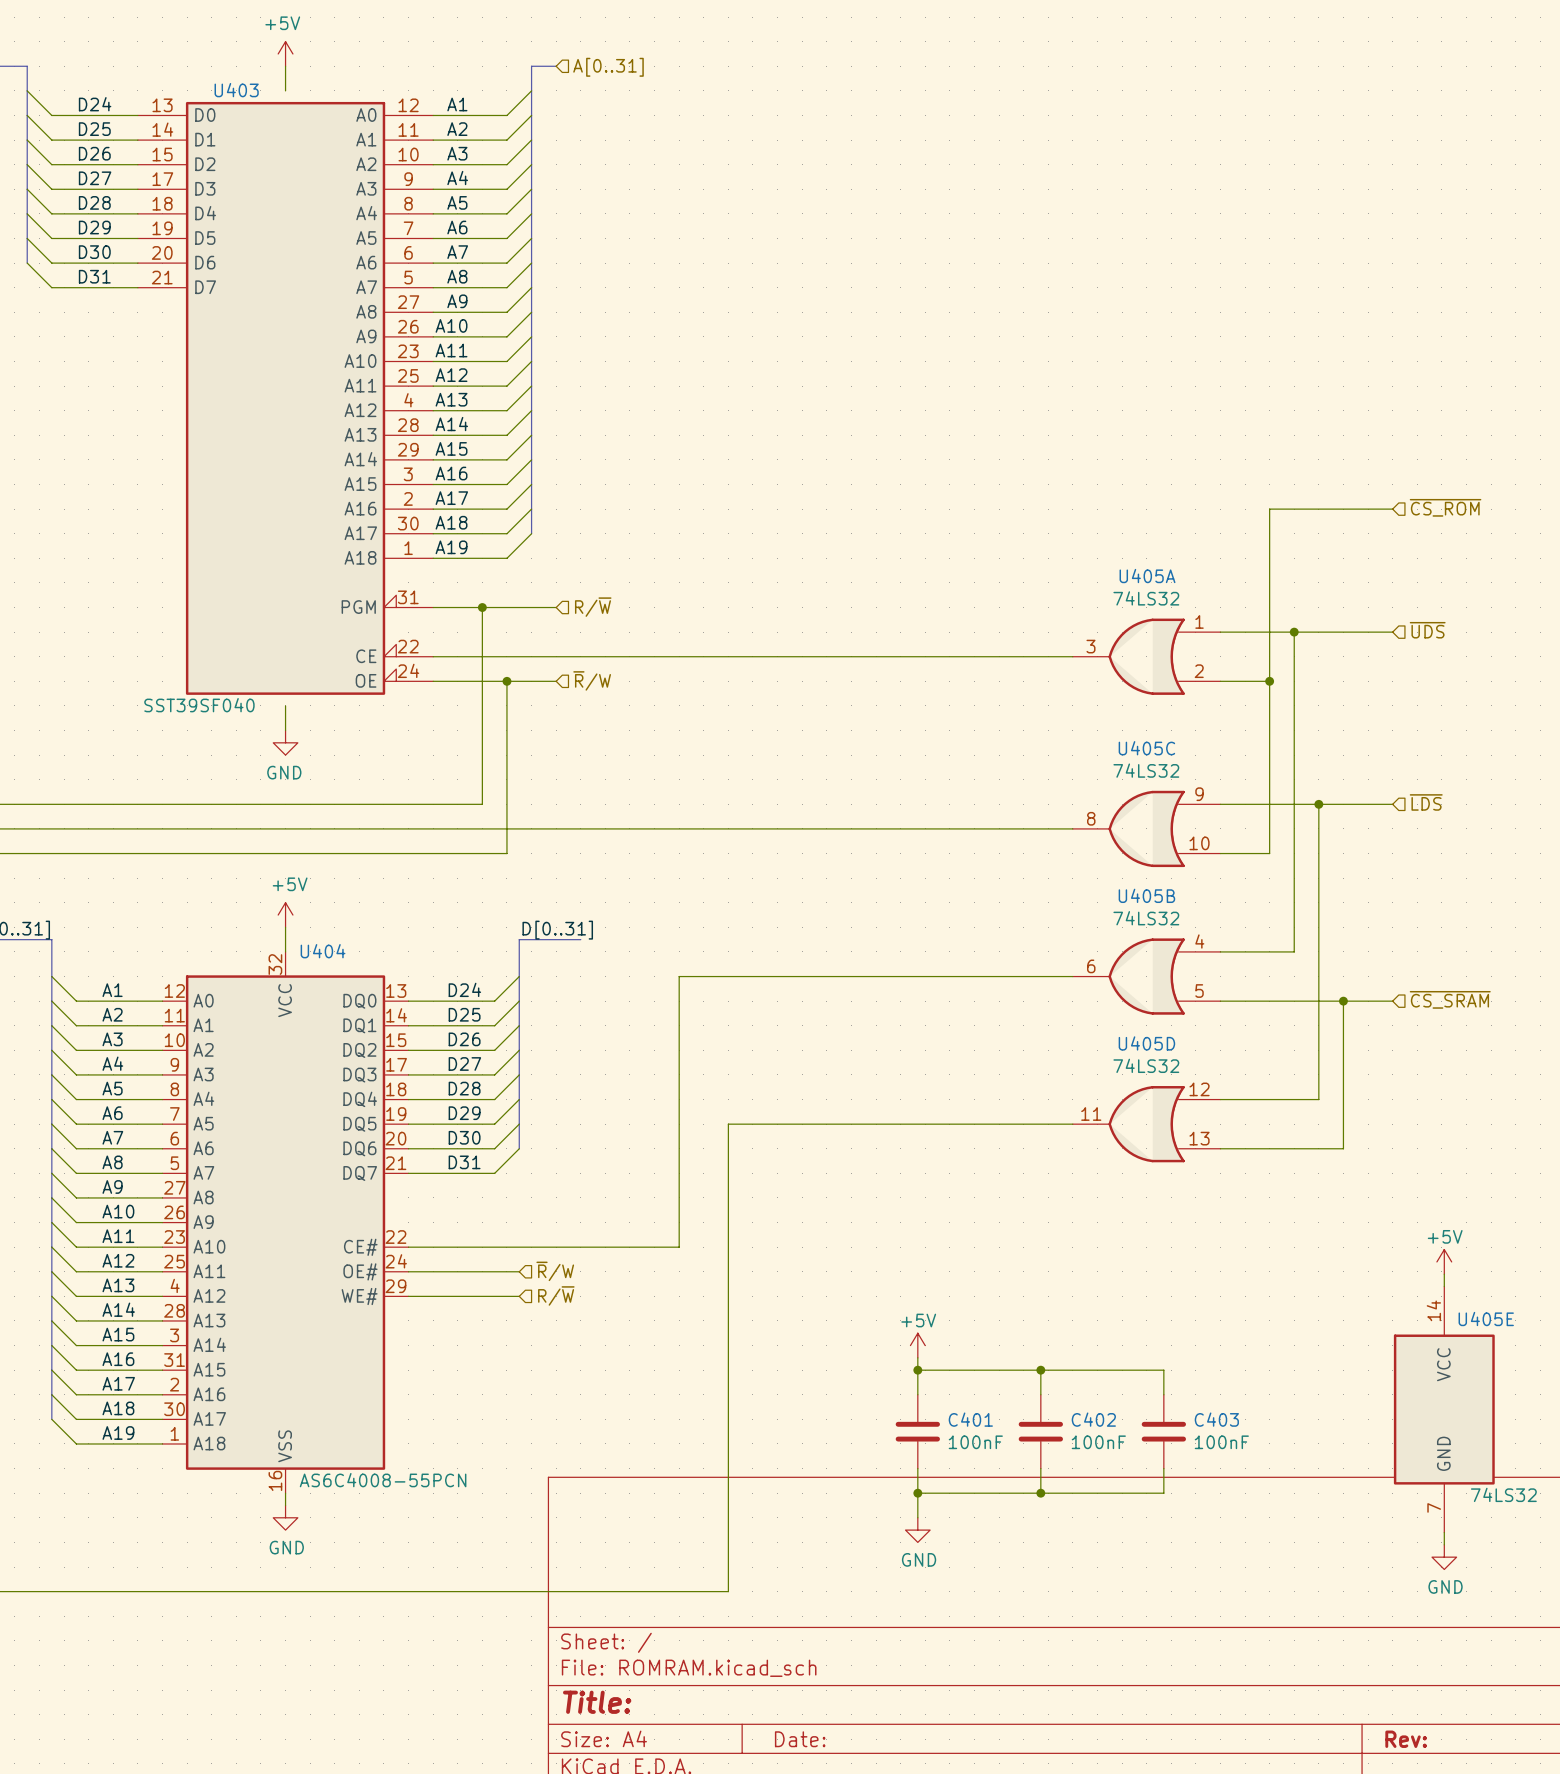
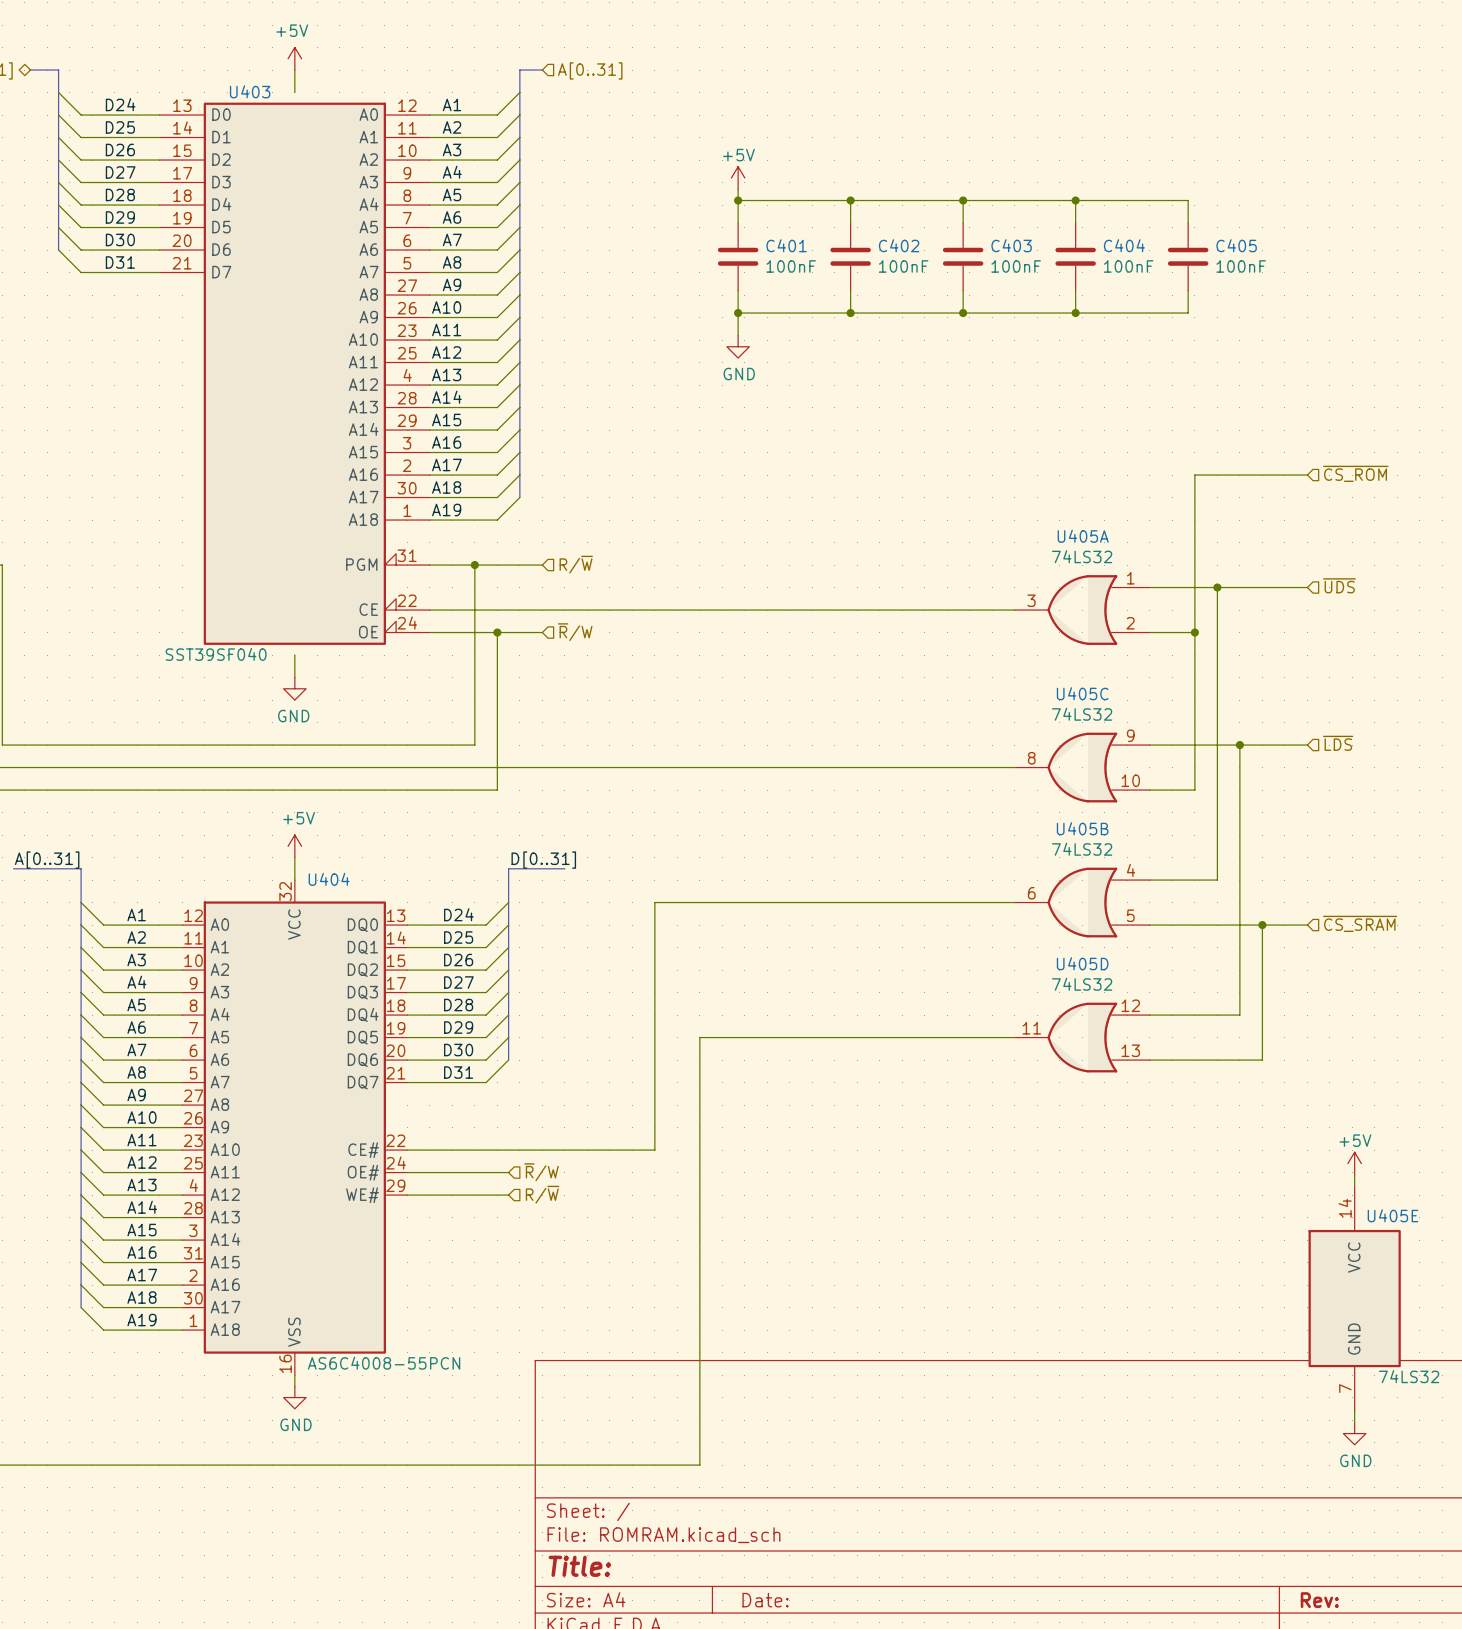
power symbol: none -> +5V (738, 178)
wire: none -> (738, 189) (738, 223)
wire: none -> (738, 200) (1188, 200) (1188, 223)
junction: none -> (738, 200)
wire: none -> (850, 200) (850, 223)
junction: none -> (850, 200)
wire: none -> (963, 200) (963, 223)
junction: none -> (963, 200)
wire: none -> (1075, 200) (1075, 223)
junction: none -> (1075, 200)
C404: none -> 100nF (1075, 256)
C405: none -> 100nF (1188, 256)
wire: none -> (738, 290) (738, 335)
wire: none -> (850, 290) (850, 313)
wire: none -> (963, 290) (963, 313)
wire: none -> (1075, 290) (1075, 313)
wire: none -> (1188, 290) (1188, 313) (738, 313)
junction: none -> (738, 313)
junction: none -> (850, 313)
junction: none -> (963, 313)
junction: none -> (1075, 313)
power symbol: none -> GND (738, 346)
power symbol: +5V (917, 1345) -> none
wire: (917, 1357) (917, 1394) -> none
wire: (917, 1370) (1163, 1370) (1163, 1394) -> none
junction: (917, 1370) -> none
wire: (1040, 1370) (1040, 1394) -> none
junction: (1040, 1370) -> none
C401 position: (917, 1431) -> (738, 256)
C402 position: (1040, 1431) -> (850, 256)
C403 position: (1163, 1431) -> (963, 256)
wire: (917, 1468) (917, 1517) -> none
wire: (1040, 1468) (1040, 1493) -> none
wire: (1163, 1468) (1163, 1493) (917, 1493) -> none
junction: (917, 1493) -> none
junction: (1040, 1493) -> none
power symbol: GND (917, 1530) -> none

